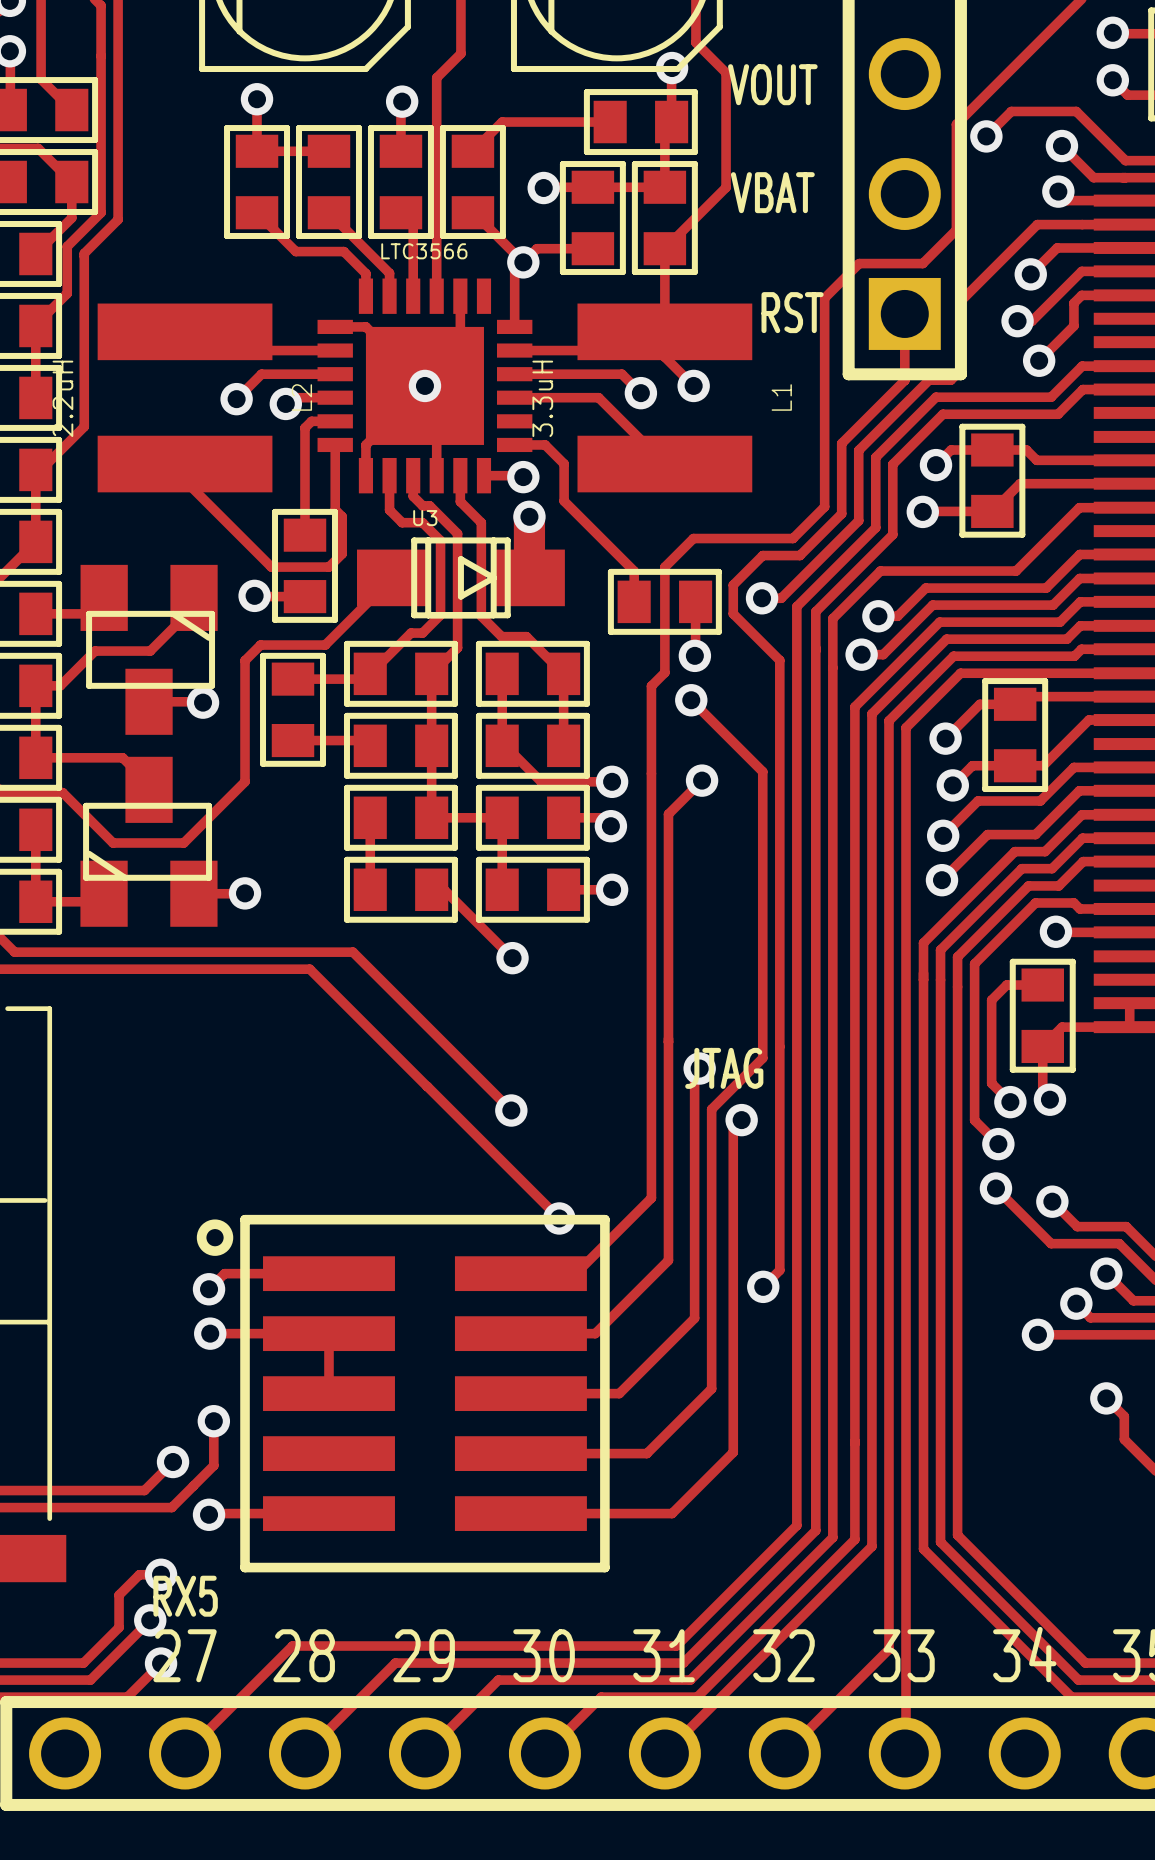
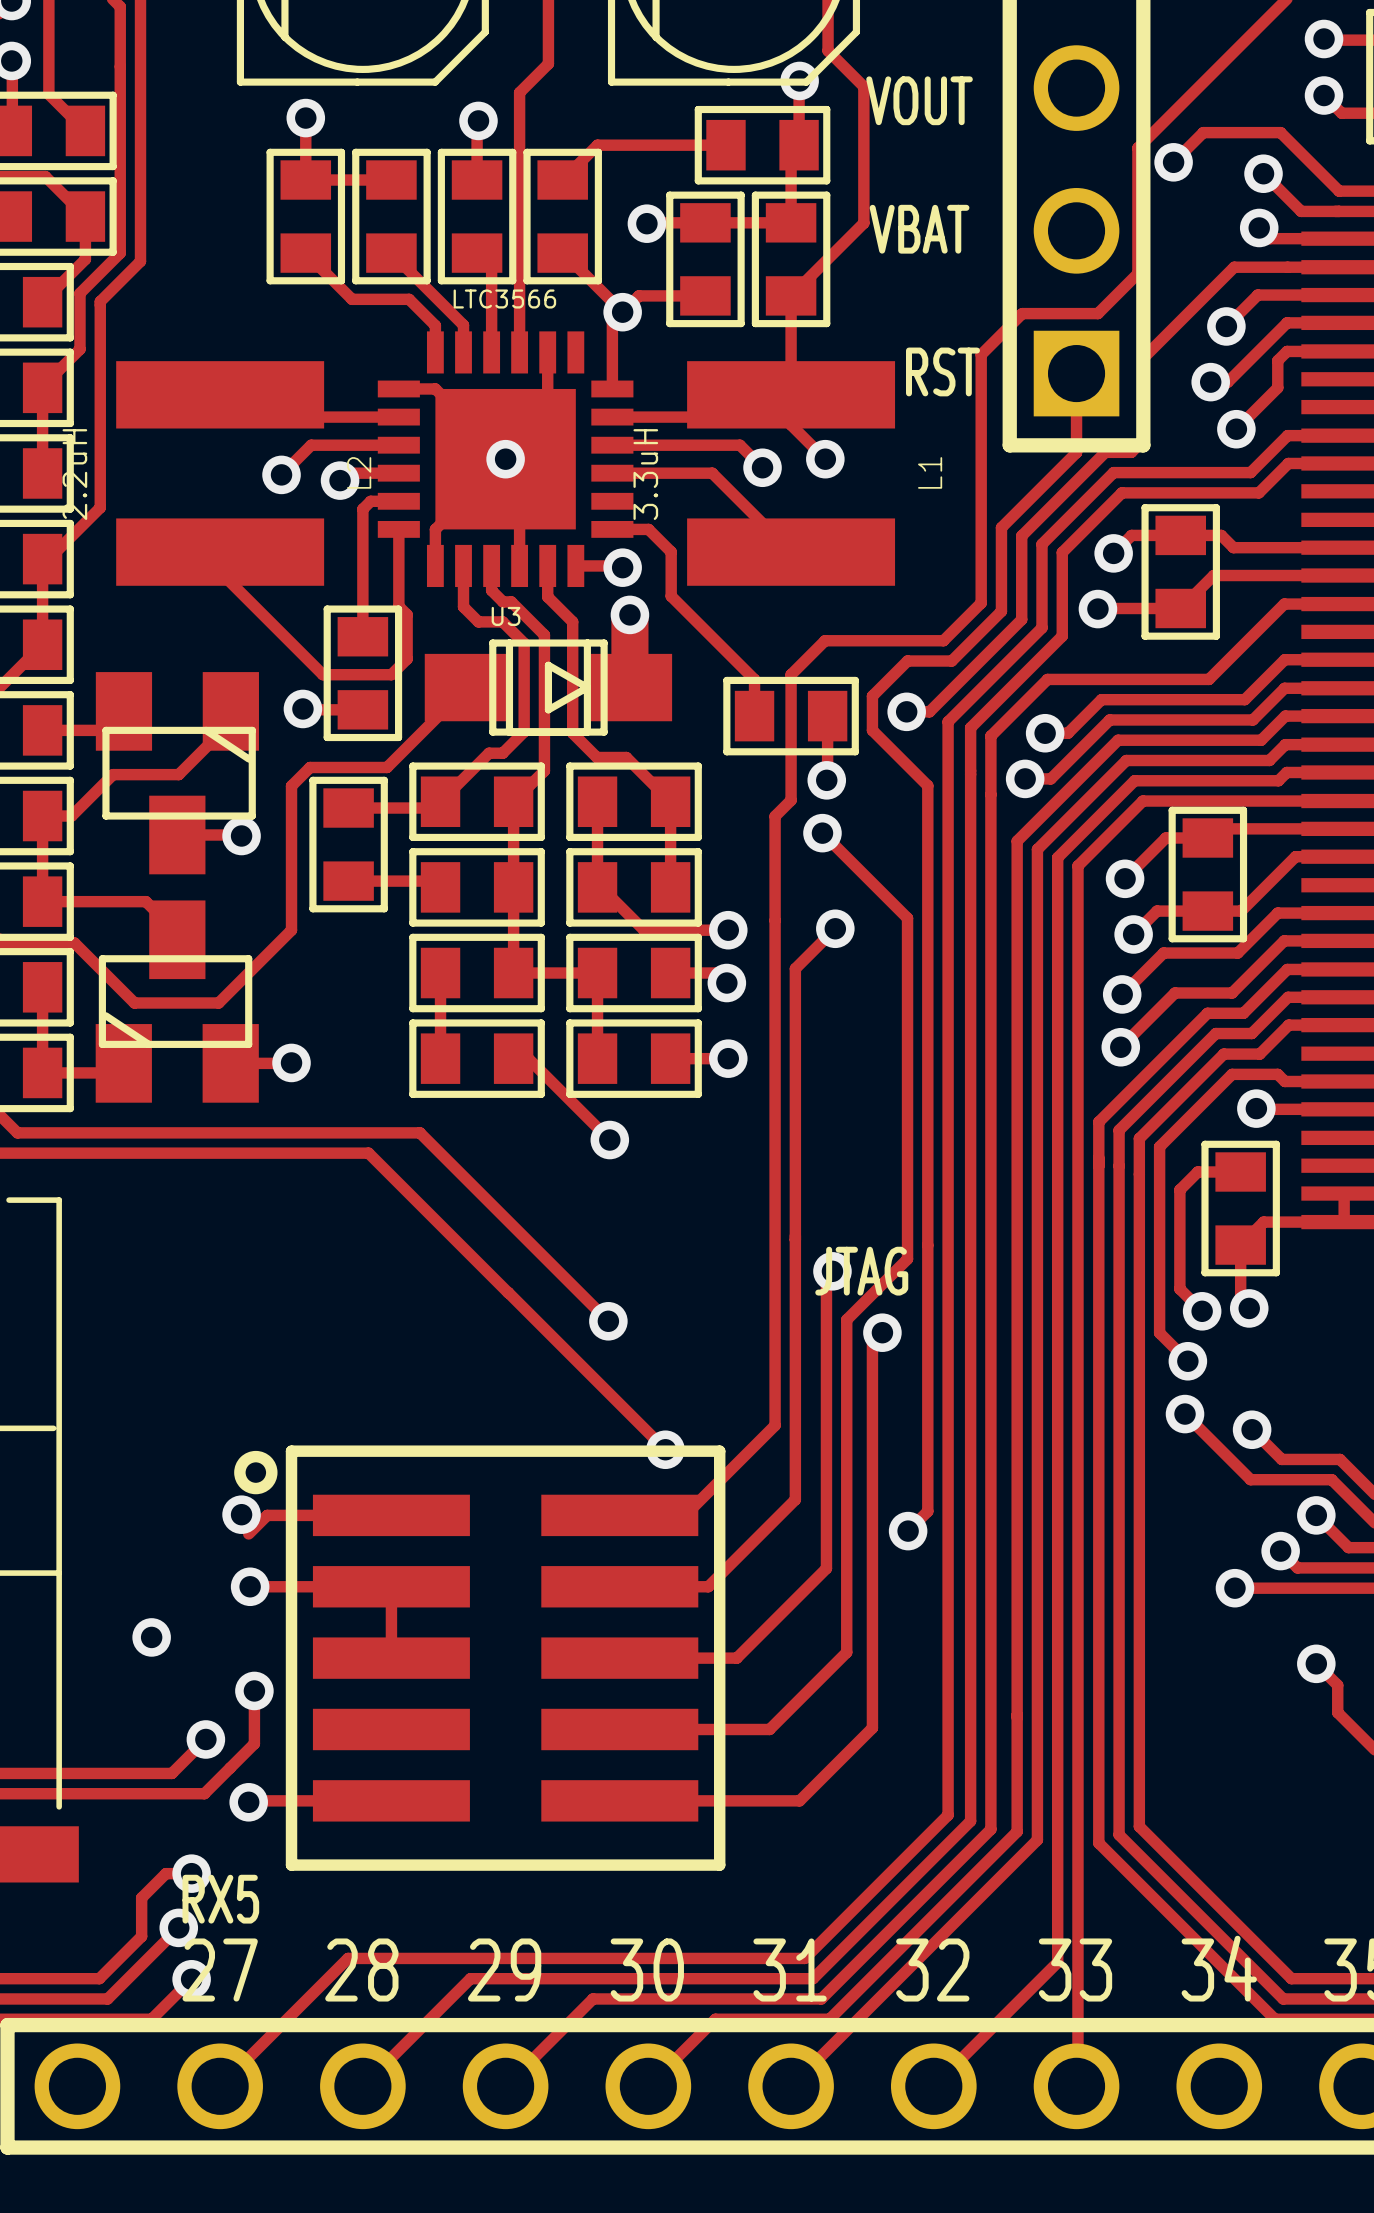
via position: (209, 1289) -> (241, 1514)
via: none -> (151, 1637)

